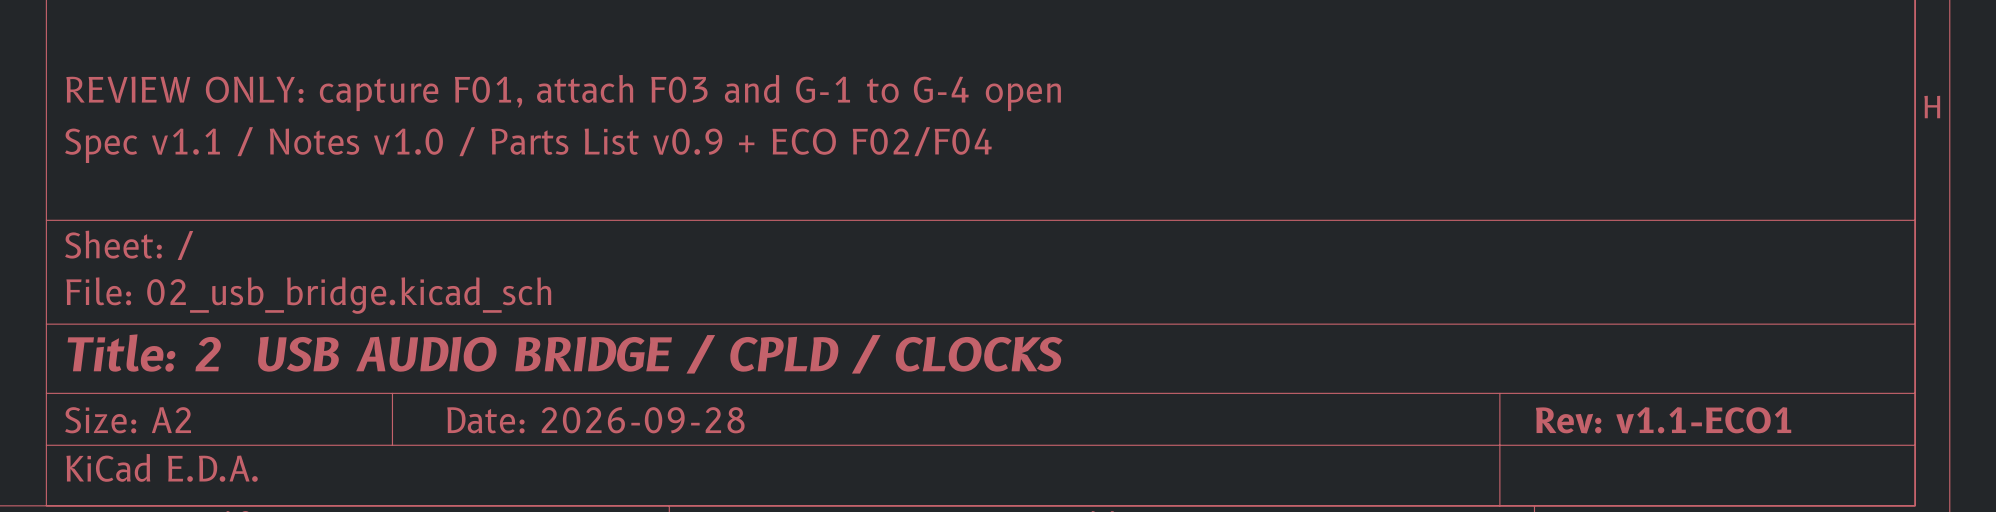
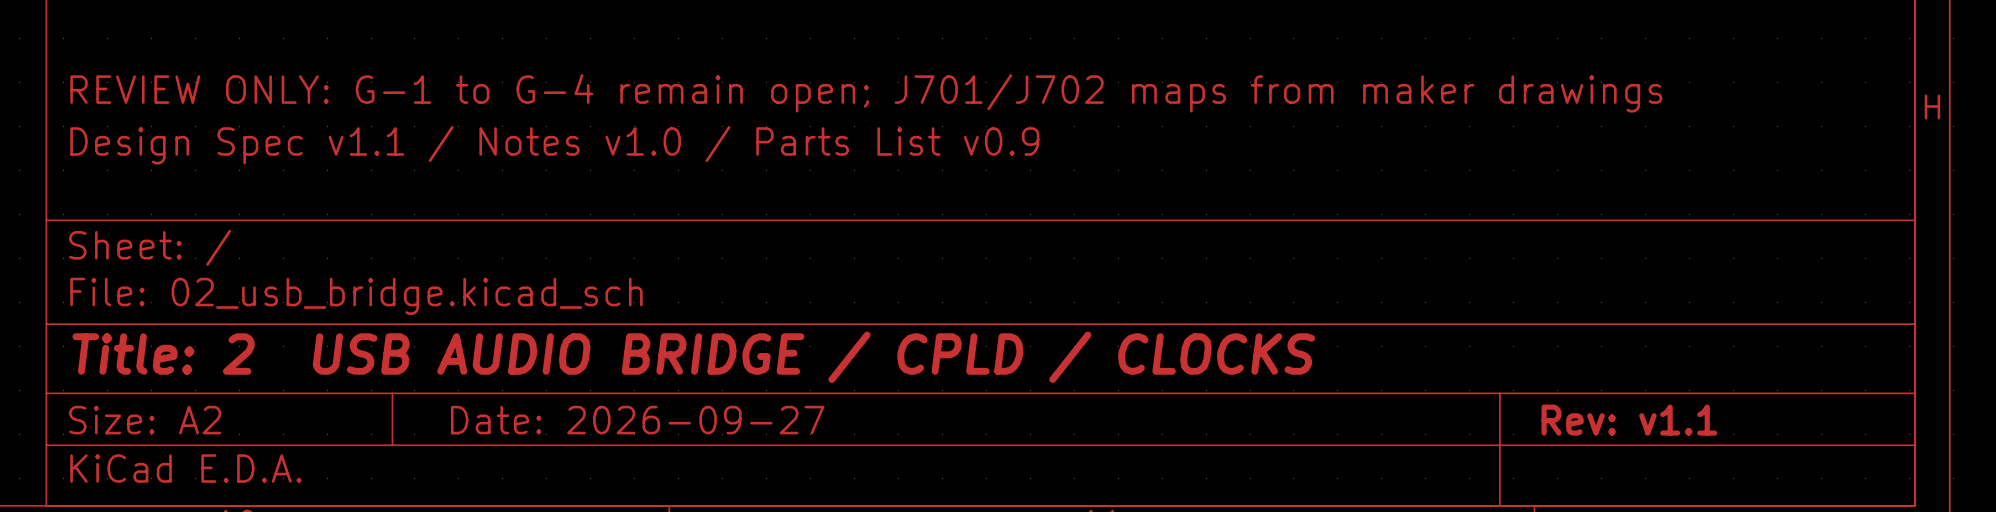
title block: REVIEW ONLY: capture F01, attach F03 and G-1 to G-4 open (563, 93) -> REVIEW ONLY: G-1 to G-4 remain open; J701/J702 maps from maker drawings (866, 93)
title block: Spec v1.1 / Notes v1.0 / Parts List v0.9 + ECO F02/F04 (528, 145) -> Design Spec v1.1 / Notes v1.0 / Parts List v0.9 (554, 145)
title block: Date: 2026-09-28 (595, 420) -> Date: 2026-09-27 (637, 420)
title block: Rev: v1.1-ECO1 (1663, 420) -> Rev: v1.1 (1629, 420)

